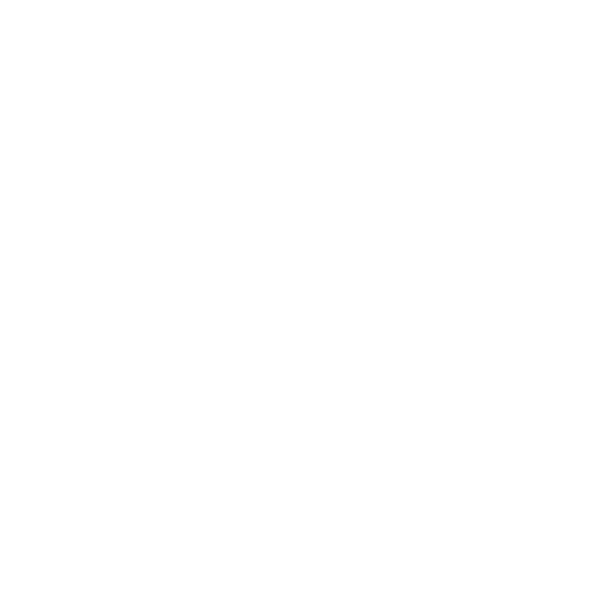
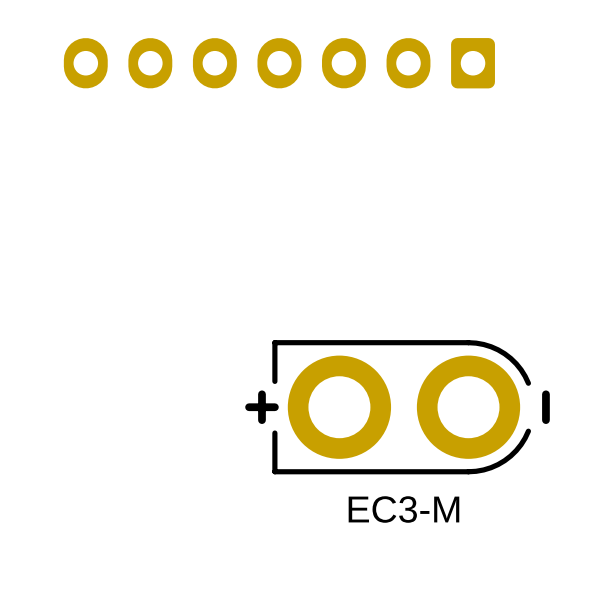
part: none -> (279, 63)
part: none -> (397, 407)

